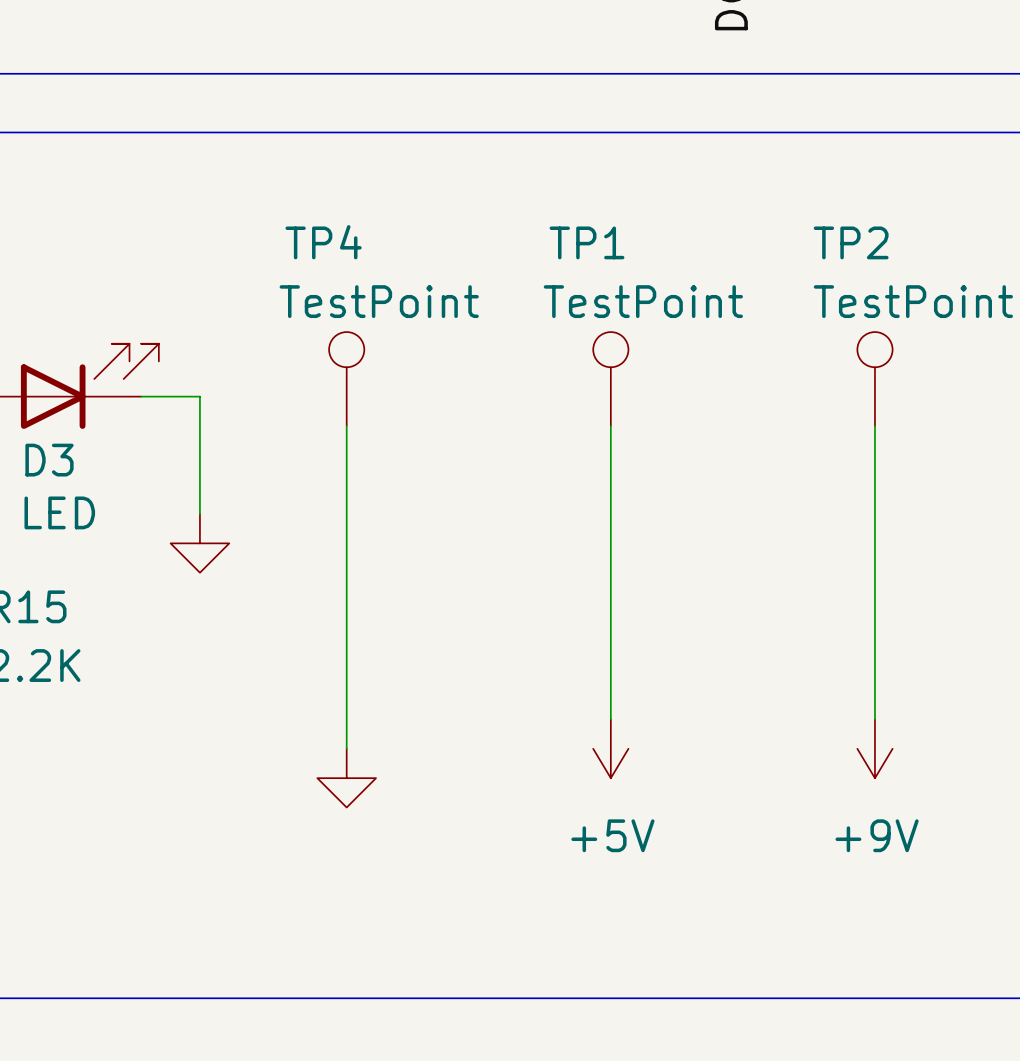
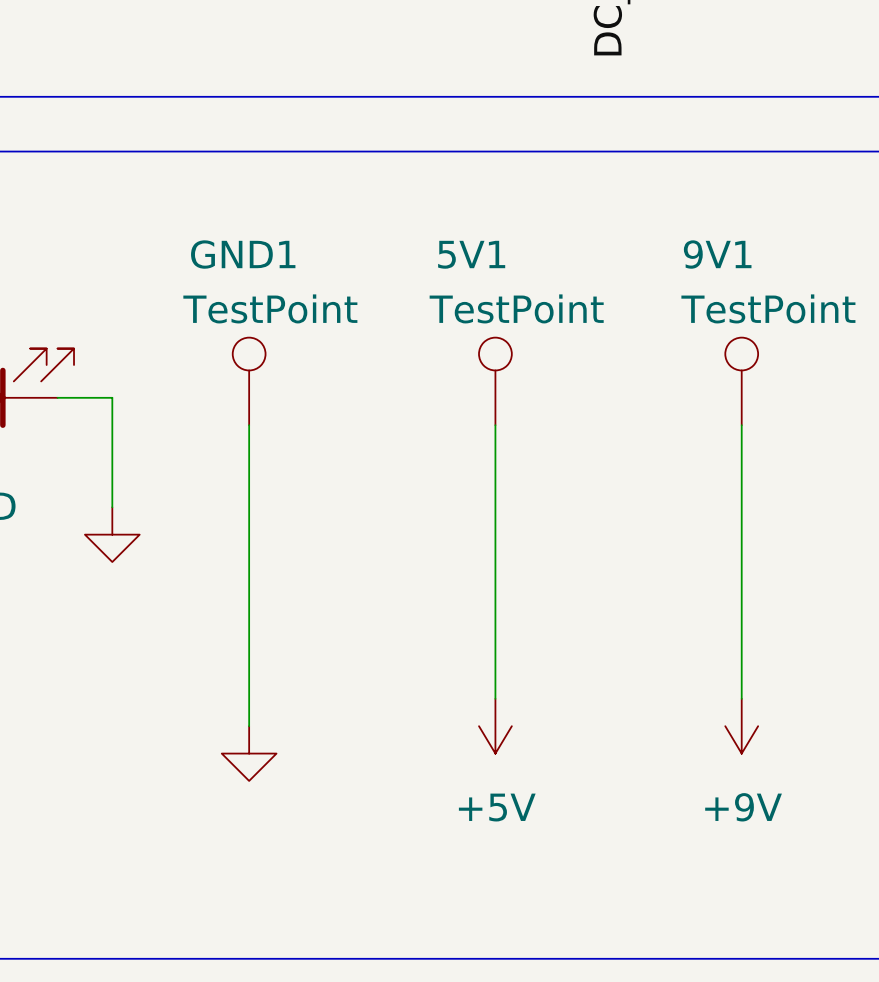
TP4 name: TP4 (323, 242) -> GND1 (243, 254)
TP1 name: TP1 (587, 242) -> 5V1 (471, 254)
TP2 name: TP2 (851, 242) -> 9V1 (717, 254)

